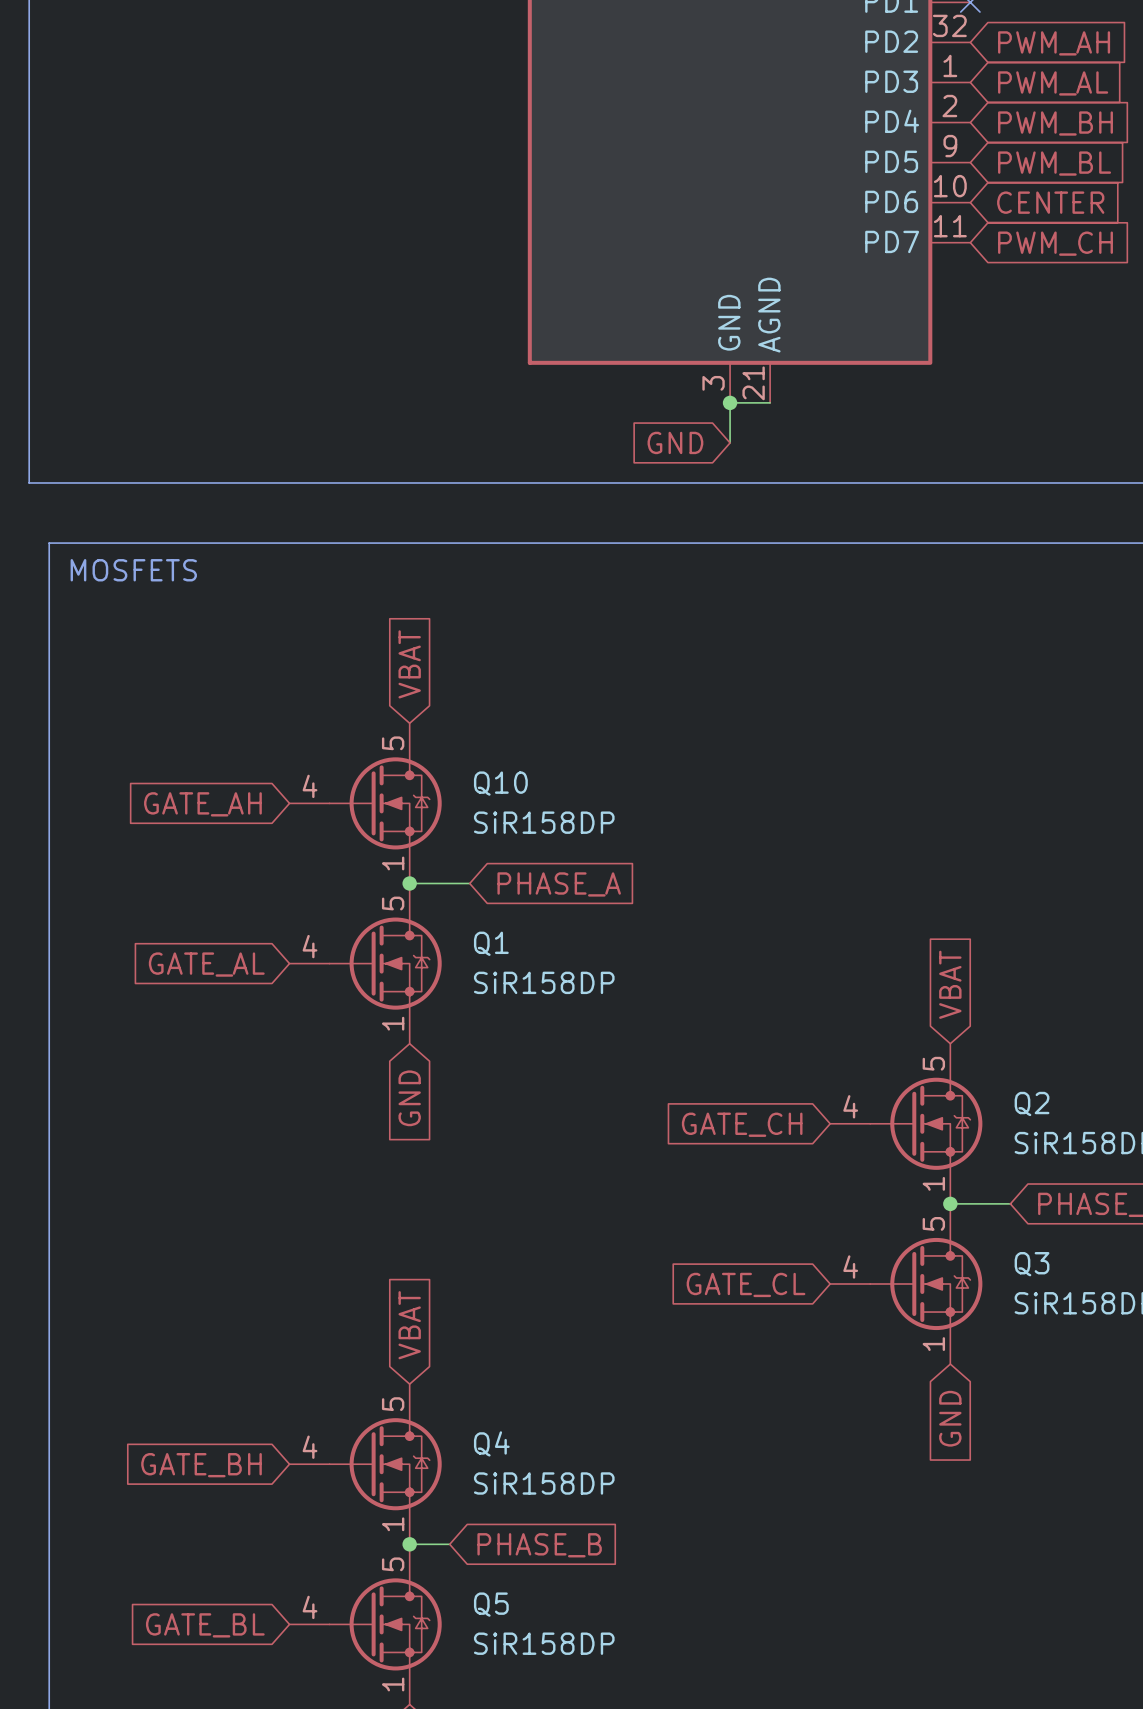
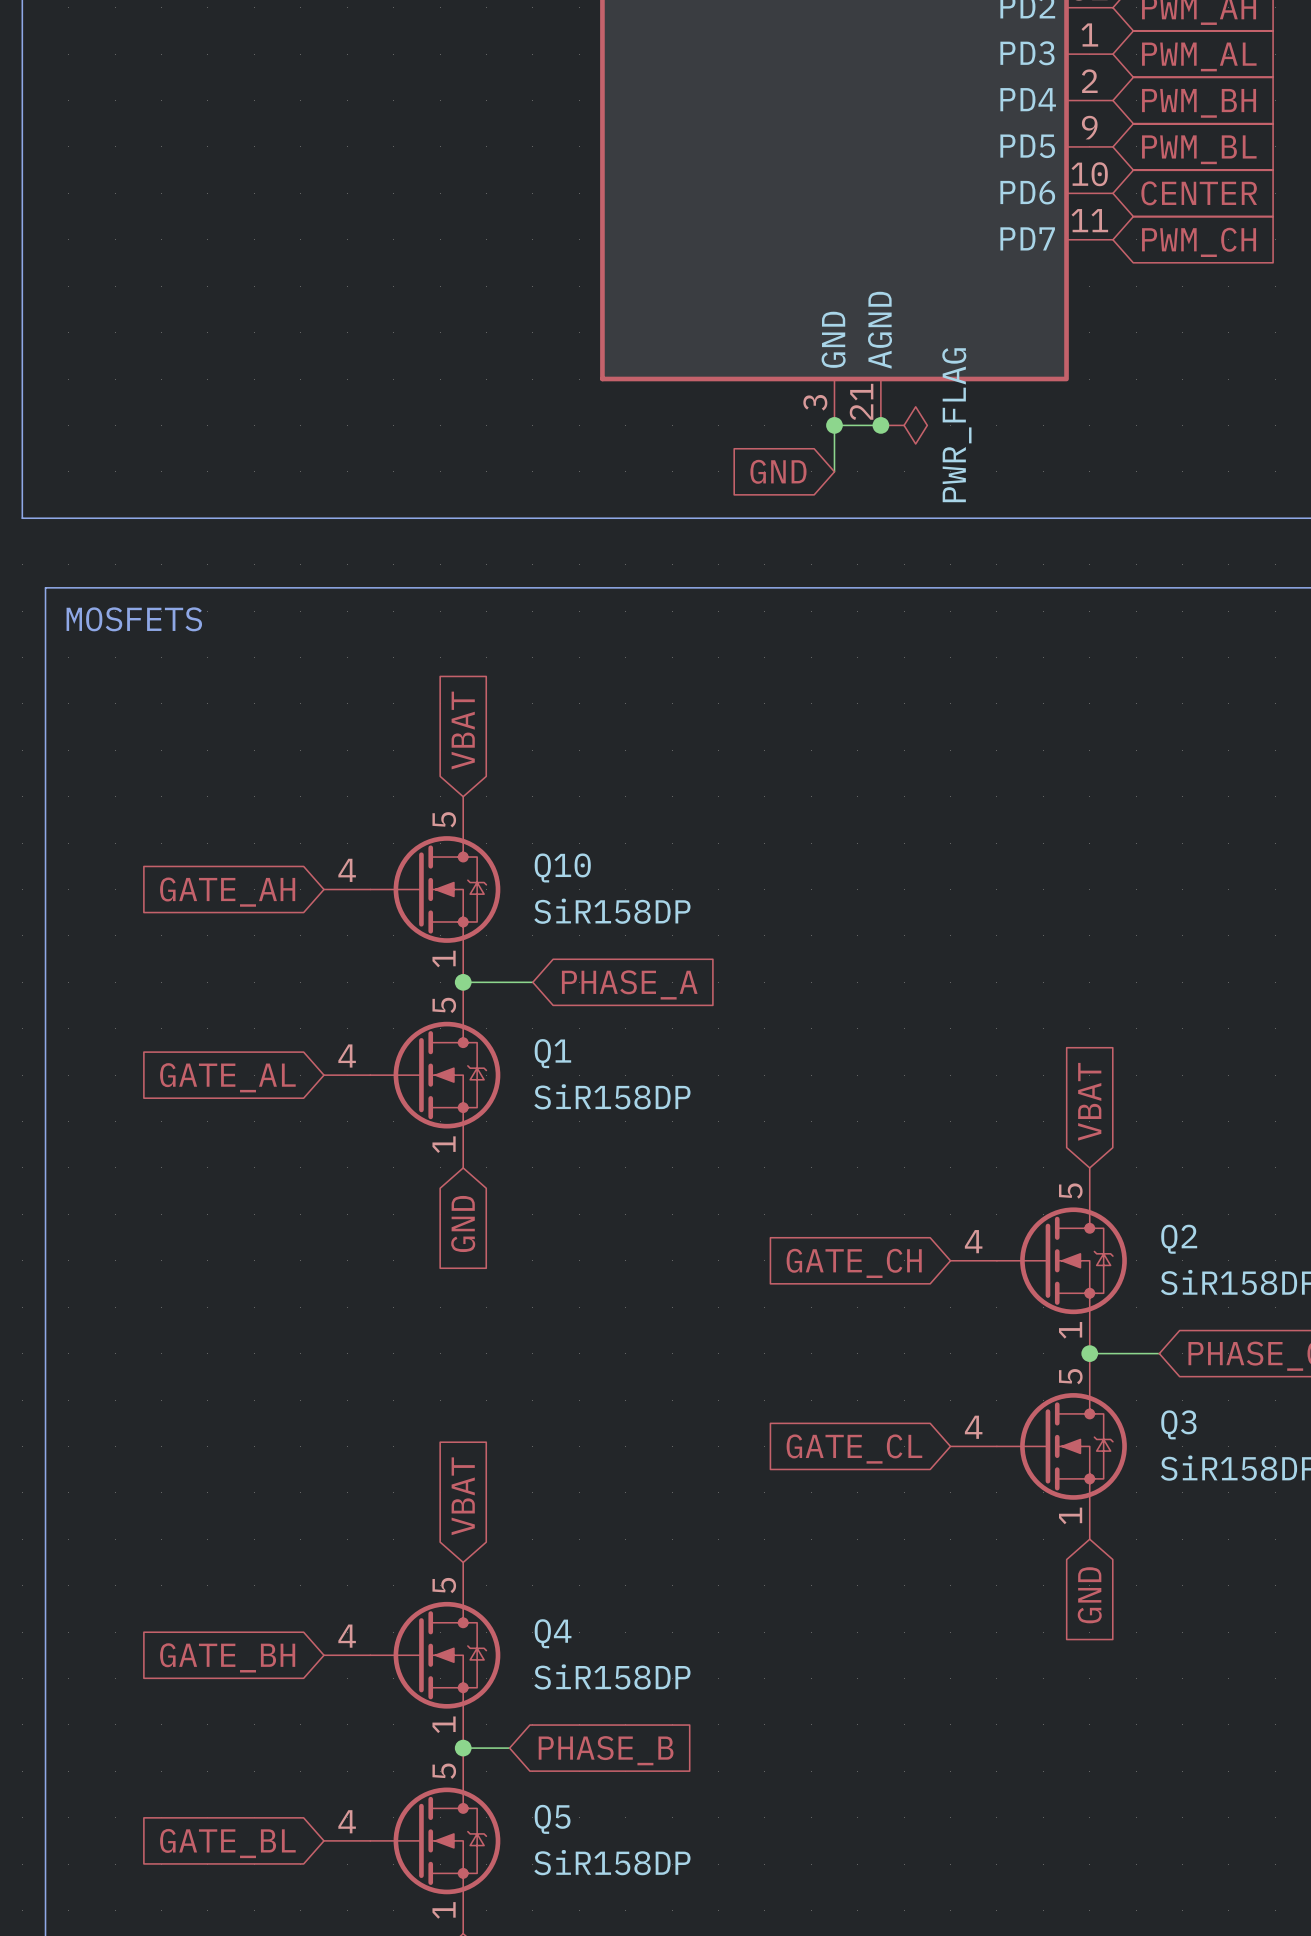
junction: none -> (880, 425)
power symbol: none -> PWR_FLAG (904, 425)

